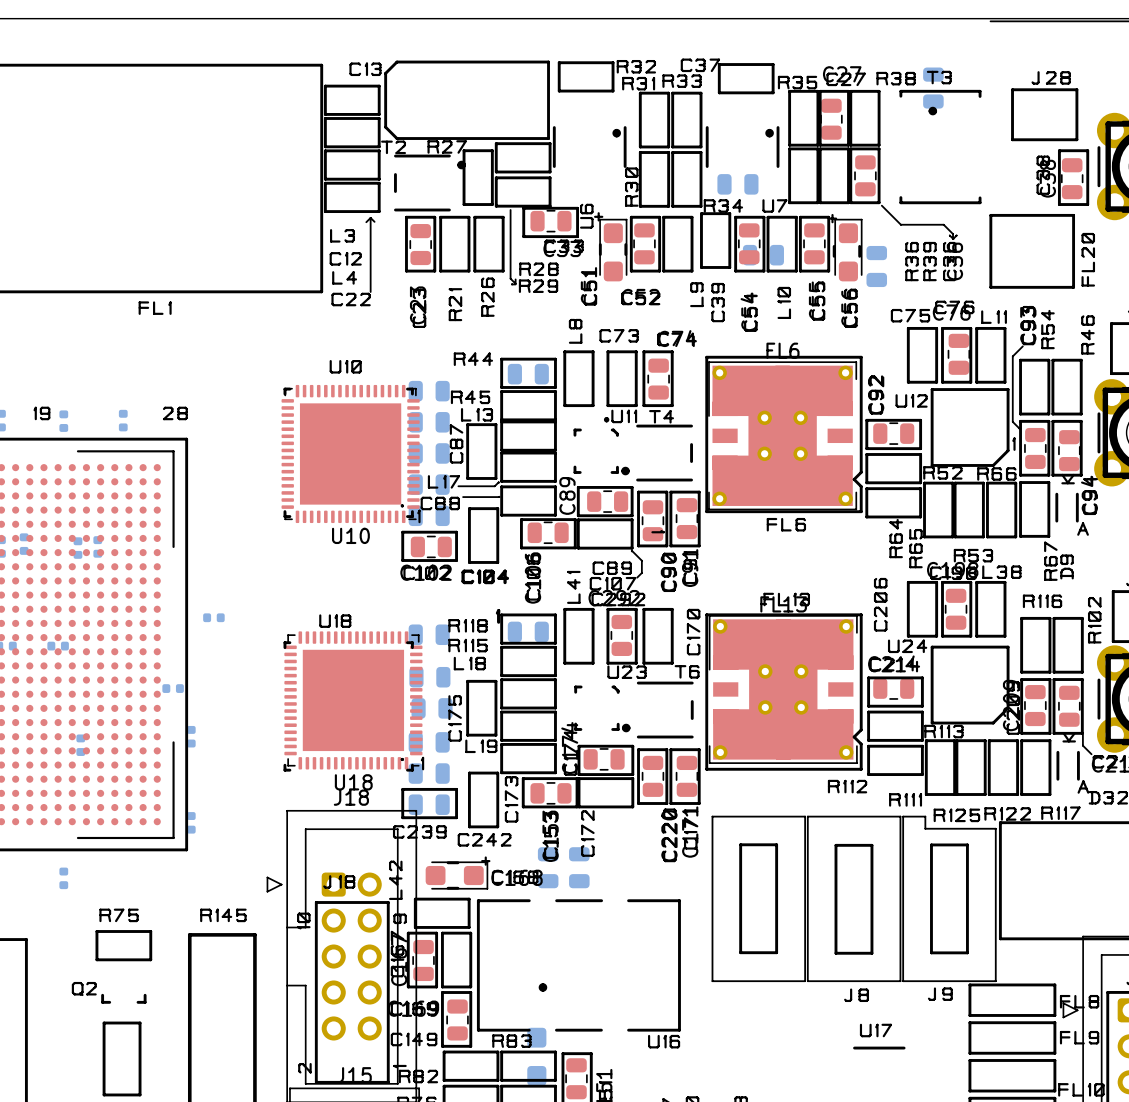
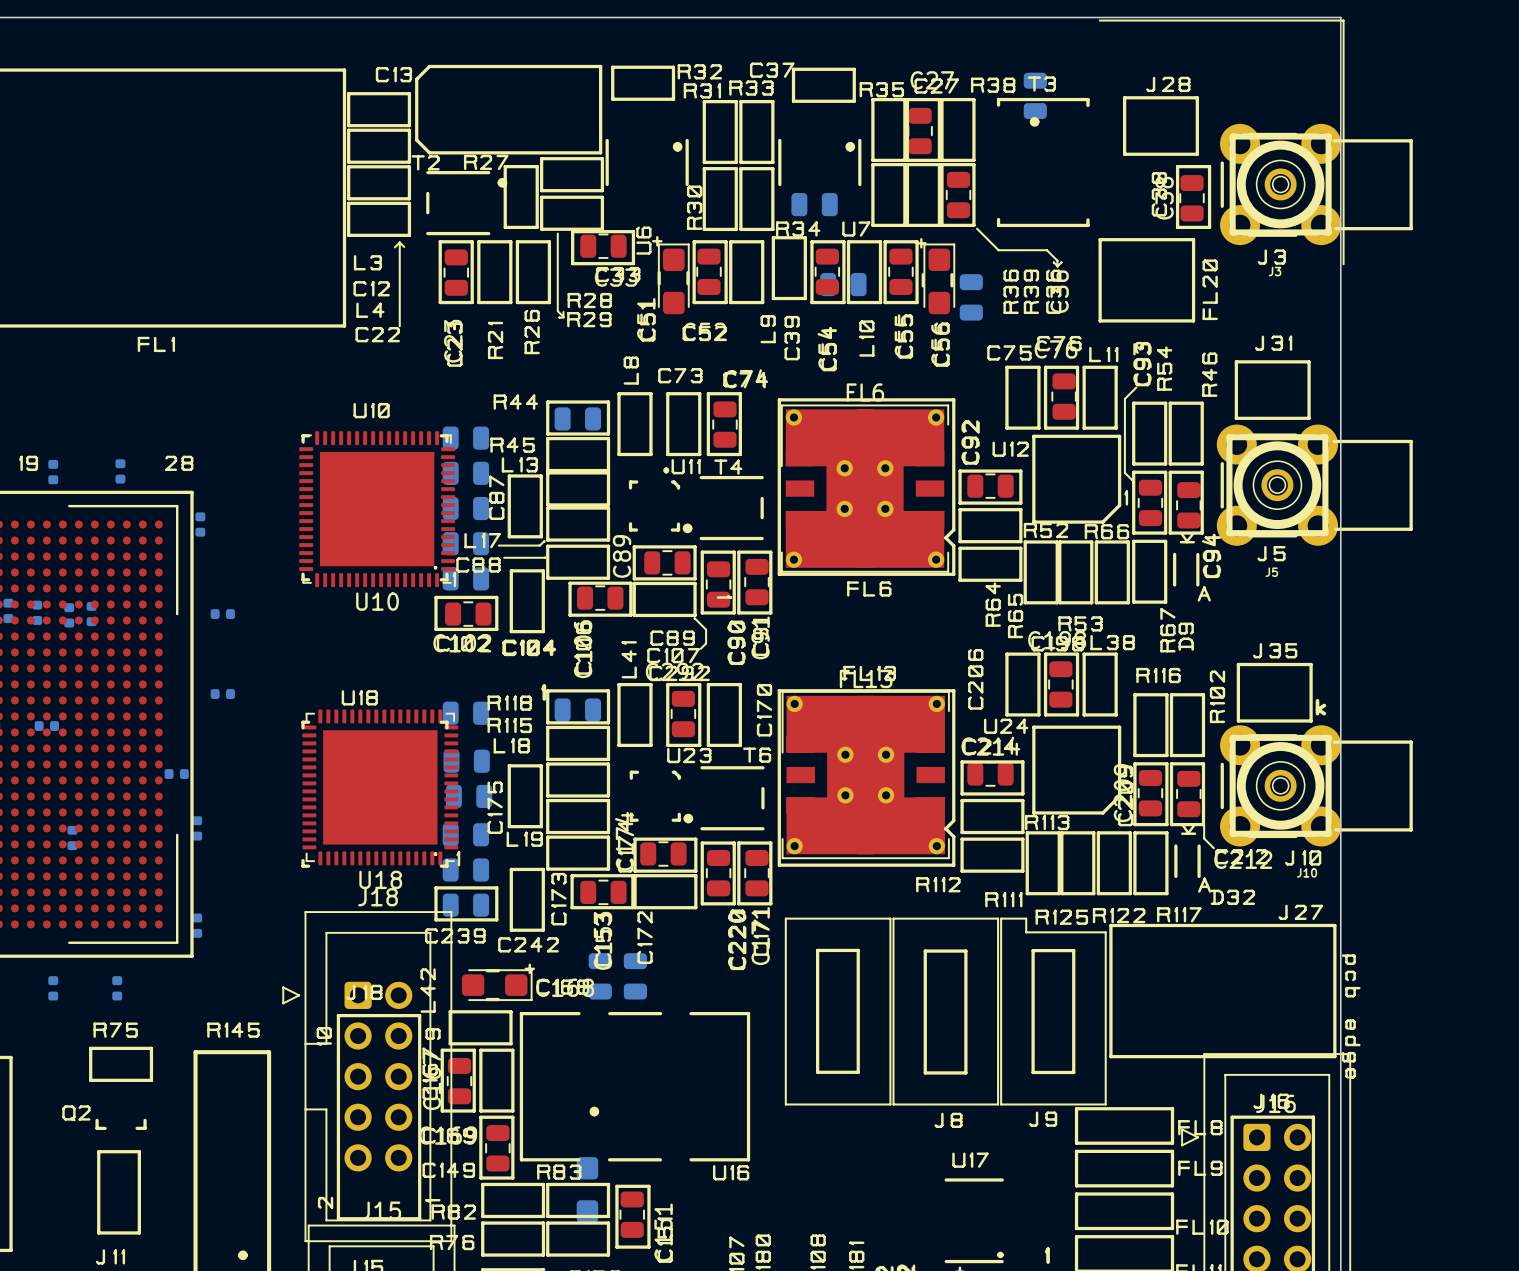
part: none -> (200, 524)
part: none -> (37, 612)
part: none -> (222, 614)
part: none -> (117, 988)

